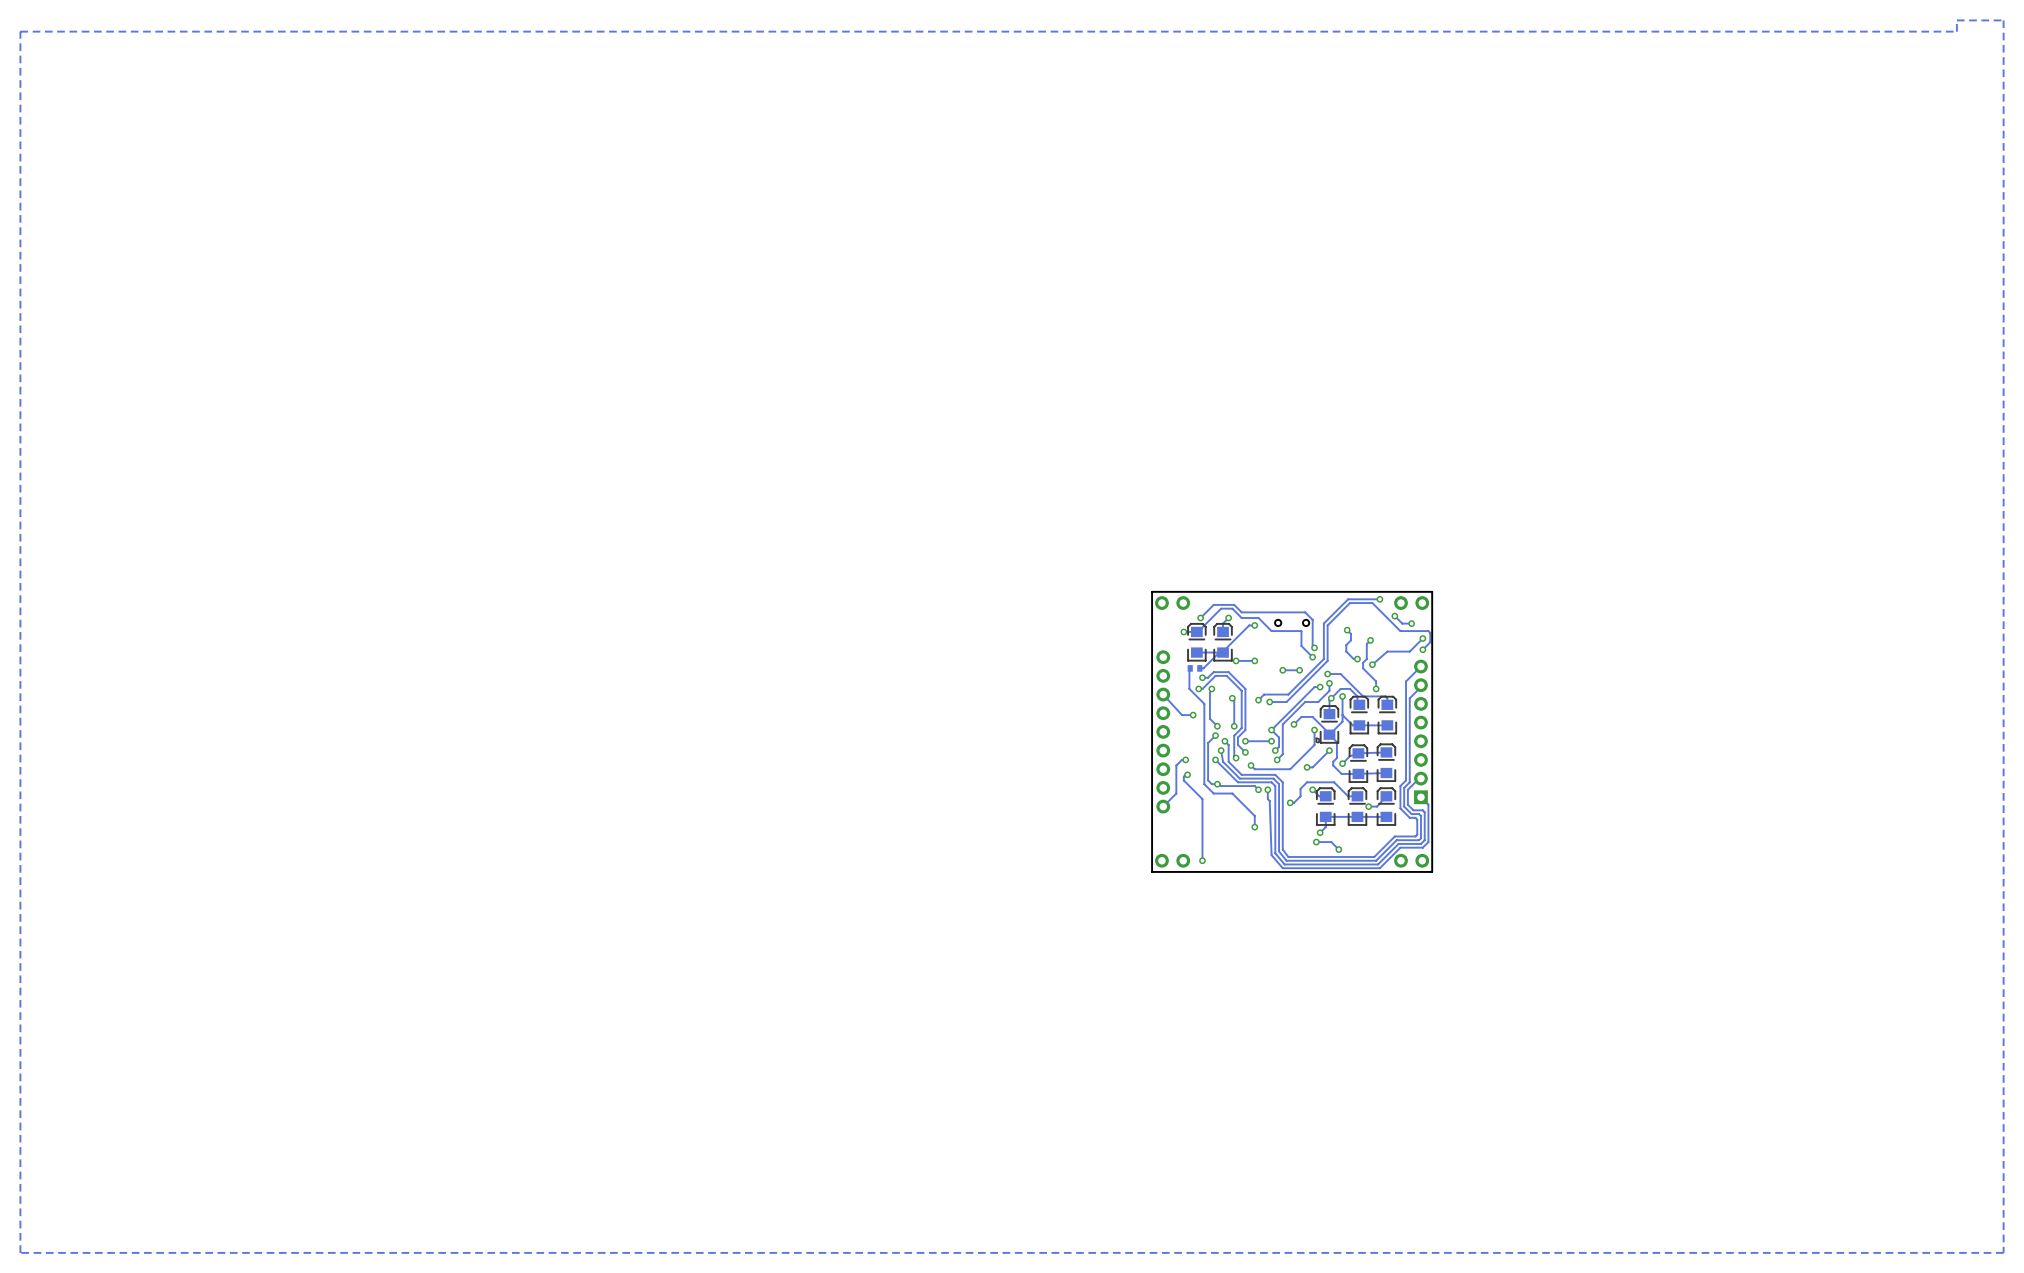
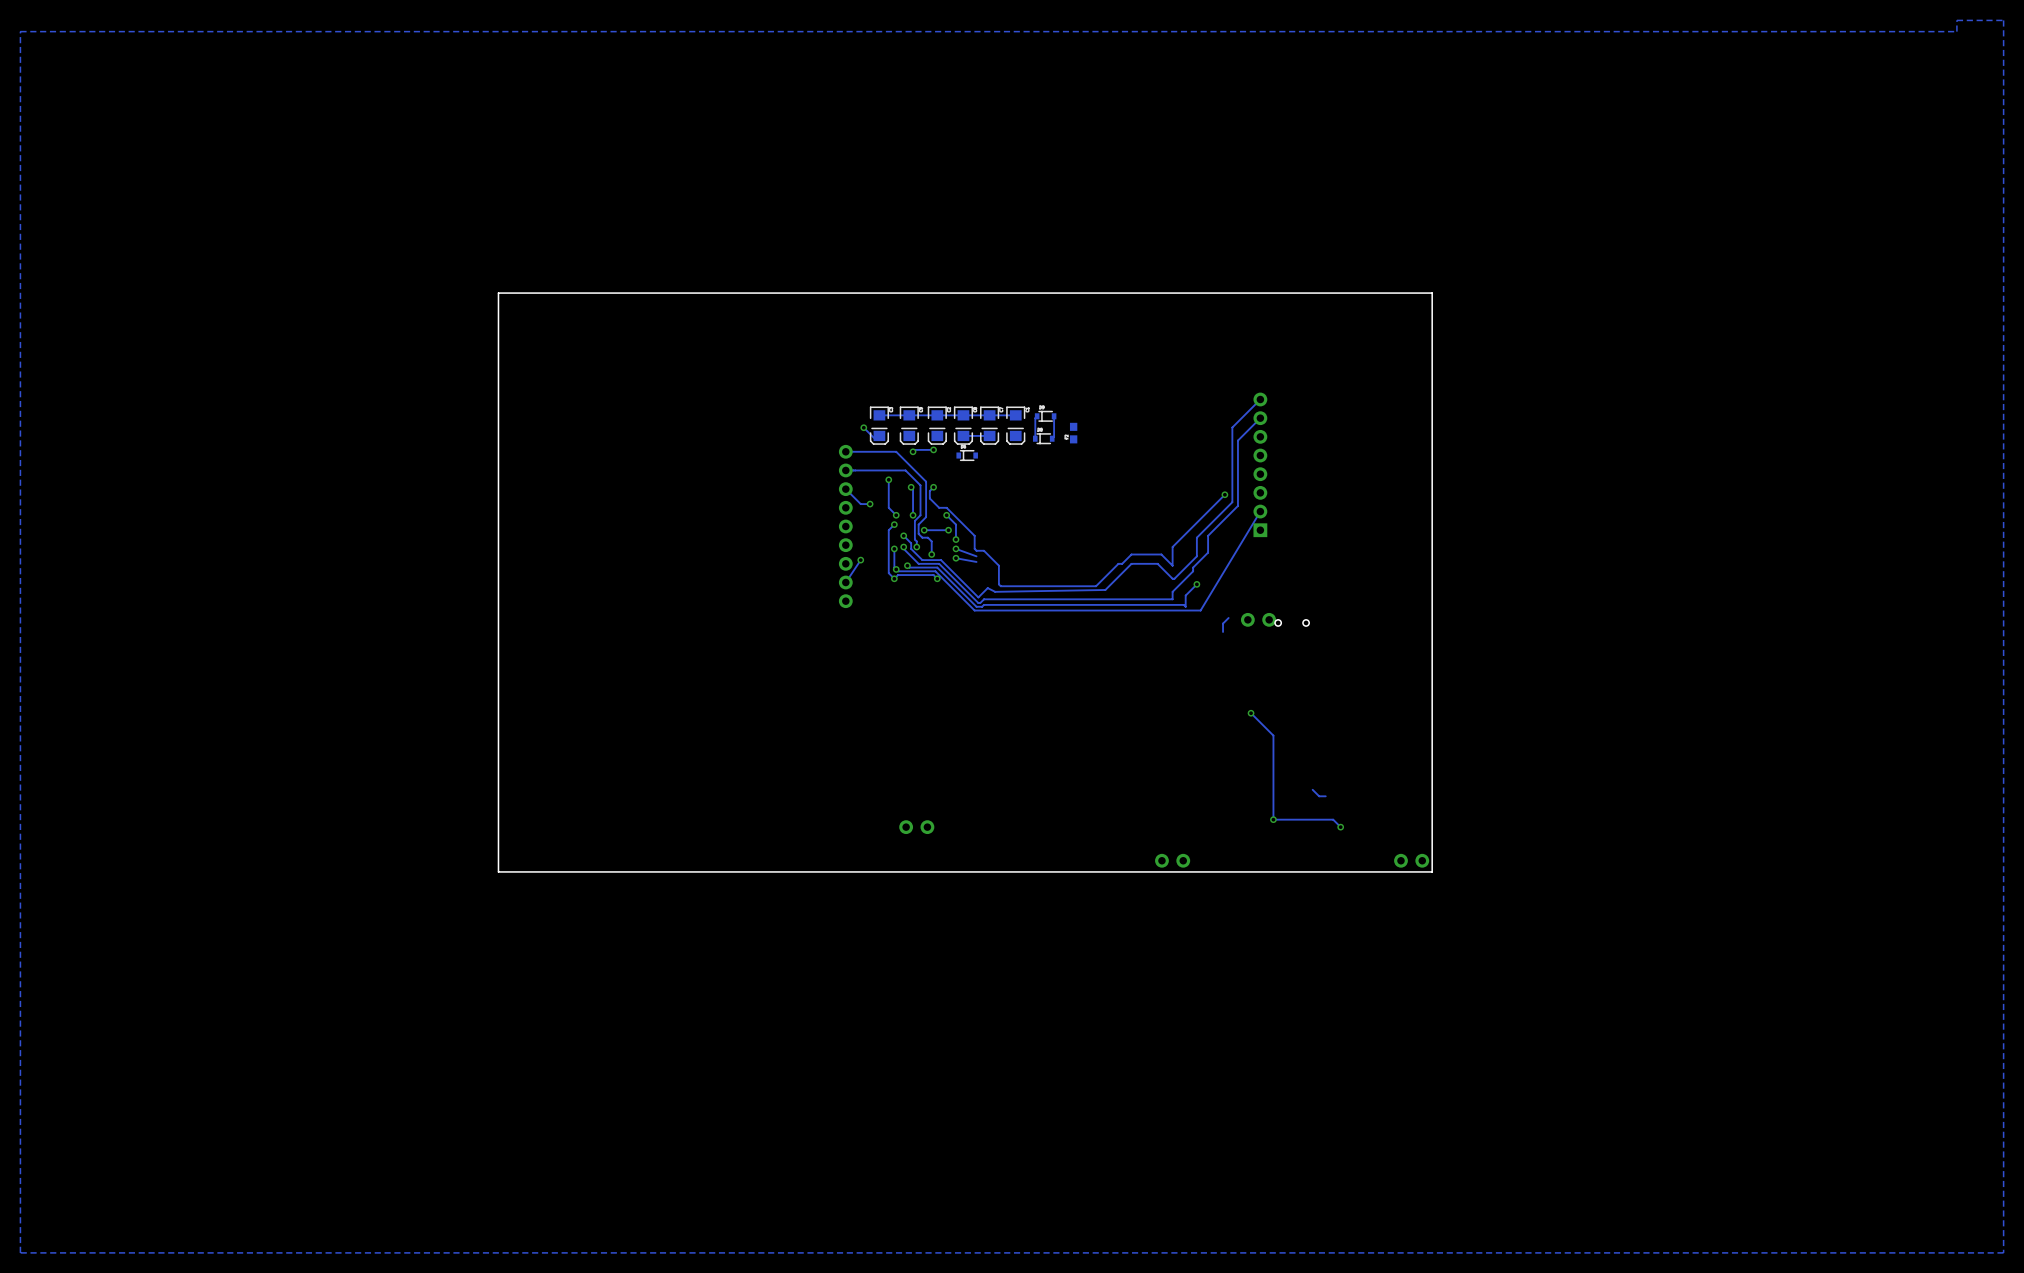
track: none -> (1260, 399) (1232, 427) (1232, 502) (1196, 537) (1196, 556) (1174, 578) (1157, 563) (1131, 563) (1105, 589) (995, 591) (987, 588) (978, 597) (941, 560) (922, 560) (911, 548) (911, 543) (903, 535)
track: none -> (1015, 415) (879, 415)
track: none -> (1037, 416) (1035, 418) (1035, 438)
part: none -> (1045, 416)
track: none -> (1054, 416) (1054, 436) (1052, 438)
track: none -> (1260, 418) (1237, 440) (1237, 505) (1208, 535) (1208, 552) (1172, 591) (1172, 599) (984, 599) (978, 603) (939, 563) (918, 563) (903, 547)
part: none -> (879, 425)
part: none -> (909, 425)
part: none -> (937, 425)
part: none -> (963, 425)
part: none -> (1015, 425)
track: none -> (863, 427) (875, 439) (879, 439) (879, 435)
via: none -> (863, 427)
part: none -> (1073, 433)
track: none -> (989, 435) (963, 435)
part: none -> (1043, 438)
track: none -> (933, 449) (914, 449) (913, 451)
via: none -> (933, 449)
track: none -> (845, 451) (896, 451) (926, 481) (926, 517) (918, 524) (918, 533) (931, 541) (931, 554)
via: none -> (913, 451)
part: none -> (967, 455)
part: none -> (1260, 464)
track: none -> (845, 470) (905, 470) (920, 485) (920, 515) (914, 520) (916, 547)
track: none -> (888, 479) (888, 507) (896, 515)
via: none -> (888, 479)
track: none -> (911, 487) (913, 489) (913, 515)
via: none -> (911, 487)
track: none -> (933, 487) (929, 491) (929, 498) (939, 507) (946, 507) (974, 535) (974, 548) (984, 550) (998, 565) (998, 584) (1000, 586) (1096, 586) (1118, 563) (1122, 563) (1131, 554) (1161, 554) (1172, 565) (1172, 547) (1224, 494)
via: none -> (933, 487)
track: none -> (845, 489) (860, 504) (870, 504)
via: none -> (1224, 494)
via: none -> (870, 504)
track: none -> (1260, 511) (1200, 610) (974, 610) (935, 571) (898, 571) (894, 567) (894, 548)
via: none -> (896, 515)
via: none -> (913, 515)
track: none -> (946, 515) (955, 524) (955, 539)
via: none -> (946, 515)
track: none -> (894, 524) (888, 530) (888, 573) (894, 578) (898, 575) (933, 575) (937, 578)
via: none -> (894, 524)
part: none -> (845, 526)
via: none -> (924, 530)
track: none -> (948, 530) (924, 530)
via: none -> (948, 530)
via: none -> (903, 535)
via: none -> (955, 539)
via: none -> (903, 547)
via: none -> (916, 547)
via: none -> (894, 548)
track: none -> (955, 548) (976, 556)
via: none -> (955, 548)
via: none -> (931, 554)
track: none -> (955, 558) (976, 561)
via: none -> (955, 558)
track: none -> (860, 560) (845, 582)
via: none -> (860, 560)
track: none -> (907, 565) (909, 567) (937, 567) (976, 606) (984, 604) (1183, 604) (1185, 606) (1185, 595) (1196, 584)
via: none -> (907, 565)
via: none -> (896, 569)
via: none -> (894, 578)
via: none -> (937, 578)
via: none -> (1196, 584)
board edge: (1432, 591) (1152, 591) (1152, 871) -> (1432, 591) (1432, 293) (498, 293) (498, 871) (1152, 871)
track: (1379, 599) (1348, 599) (1323, 623) (1323, 659) (1288, 694) (1264, 694) (1258, 700) -> none
via: (1379, 599) -> none
part: (1172, 603) -> none
part: (1411, 603) -> none
track: (1394, 616) (1402, 623) (1411, 623) -> none
via: (1394, 616) -> none
track: (1200, 617) (1213, 604) (1234, 604) (1241, 612) (1305, 612) (1312, 619) (1312, 646) (1314, 647) -> none
via: (1200, 617) -> none
via: (1228, 617) -> none
part: none -> (1258, 619)
via: (1411, 623) -> none
track: (1254, 625) (1249, 625) (1223, 652) (1196, 652) (1193, 648) -> none
via: (1254, 625) -> none
track: (1347, 630) (1350, 633) (1350, 640) (1346, 645) (1346, 651) (1353, 659) (1357, 659) -> none
via: (1347, 630) -> none
track: (1183, 631) (1197, 631) (1221, 608) (1232, 608) (1241, 617) (1258, 617) (1271, 631) (1301, 631) (1301, 646) (1312, 657) -> none
via: (1183, 631) -> none
track: (1422, 638) (1409, 651) (1387, 651) (1372, 664) (1374, 664) -> none
via: (1422, 638) -> none
track: (1370, 640) (1366, 644) (1366, 659) (1363, 662) (1363, 668) (1376, 681) (1376, 688) -> none
via: (1370, 640) -> none
part: (1196, 642) -> none
part: (1223, 642) -> none
via: (1314, 647) -> none
track: (1422, 649) (1430, 642) (1430, 632) (1428, 631) (1400, 631) (1372, 603) (1350, 603) (1327, 625) (1327, 660) (1286, 702) (1269, 702) -> none
via: (1422, 649) -> none
track: (1219, 652) (1203, 668) (1199, 668) -> none
via: (1312, 657) -> none
via: (1357, 659) -> none
via: (1236, 660) -> none
track: (1254, 660) (1236, 660) -> none
via: (1254, 660) -> none
via: (1372, 664) -> none
track: (1420, 666) (1406, 681) (1406, 780) (1400, 786) (1400, 808) (1409, 817) (1417, 819) (1417, 834) (1415, 836) (1394, 836) (1374, 857) (1288, 857) (1282, 849) (1282, 782) (1275, 774) (1241, 774) (1228, 761) (1228, 744) (1224, 741) -> none
track: (1190, 668) (1189, 688) (1204, 703) (1204, 784) (1213, 793) (1232, 793) (1254, 815) (1254, 827) -> none
part: (1195, 668) -> none
via: (1282, 670) -> none
track: (1299, 670) (1282, 670) -> none
via: (1299, 670) -> none
track: (1327, 674) (1340, 674) (1363, 696) (1385, 696) (1387, 704) -> none
via: (1327, 674) -> none
track: (1202, 677) (1208, 677) (1213, 672) (1228, 672) (1245, 688) (1245, 730) (1237, 737) (1237, 744) (1245, 752) -> none
via: (1202, 677) -> none
track: (1329, 683) (1329, 690) (1318, 702) (1305, 702) (1282, 724) (1282, 754) (1277, 759) -> none
via: (1329, 683) -> none
track: (1420, 685) (1409, 698) (1409, 782) (1404, 787) (1404, 806) (1411, 814) (1420, 815) (1420, 838) (1419, 840) (1396, 840) (1376, 860) (1286, 860) (1279, 851) (1279, 784) (1273, 778) (1239, 778) (1223, 761) (1221, 750) -> none
track: (1320, 687) (1314, 687) (1271, 730) (1279, 737) (1279, 746) (1275, 750) -> none
via: (1320, 687) -> none
track: (1198, 688) (1202, 688) (1215, 675) (1226, 675) (1241, 690) (1241, 728) (1234, 735) (1234, 756) (1236, 758) -> none
via: (1198, 688) -> none
track: (1211, 688) (1209, 692) (1209, 718) (1217, 726) -> none
via: (1211, 688) -> none
via: (1376, 688) -> none
track: (1163, 694) (1181, 715) (1193, 715) -> none
track: (1342, 696) (1342, 721) (1329, 734) (1336, 742) (1336, 758) (1333, 761) (1333, 765) (1341, 773) (1386, 773) -> none
via: (1342, 696) -> none
track: (1232, 698) (1234, 700) (1234, 726) -> none
via: (1232, 698) -> none
via: (1331, 698) -> none
via: (1258, 700) -> none
via: (1269, 702) -> none
track: (1359, 704) (1357, 696) (1350, 688) (1340, 688) (1329, 700) (1329, 714) -> none
track: none -> (1251, 713) (1273, 735) (1273, 819) (1333, 819) (1340, 827)
via: none -> (1251, 713)
via: (1193, 715) -> none
track: (1342, 715) (1352, 725) (1387, 725) -> none
part: (1359, 715) -> none
part: (1387, 715) -> none
track: (1293, 724) (1301, 716) (1312, 716) (1329, 733) (1329, 737) -> none
via: (1293, 724) -> none
part rotation: 0° (1329, 724) -> 180° (989, 425)
part position: (1329, 724) -> (989, 425)
via: (1217, 726) -> none
via: (1234, 726) -> none
via: (1271, 730) -> none
track: (1314, 730) (1314, 744) (1290, 769) (1254, 769) (1251, 765) -> none
via: (1314, 730) -> none
part: (1163, 731) -> none
part: (1420, 731) -> none
track: (1215, 735) (1208, 743) (1208, 780) (1211, 784) (1221, 786) (1254, 786) (1258, 789) -> none
via: (1215, 735) -> none
via: (1224, 741) -> none
via: (1245, 741) -> none
track: (1271, 741) (1245, 741) -> none
via: (1271, 741) -> none
via: (1221, 750) -> none
via: (1275, 750) -> none
track: (1329, 750) (1312, 767) (1307, 767) -> none
via: (1329, 750) -> none
via: (1245, 752) -> none
track: (1386, 752) (1358, 753) (1350, 756) (1342, 763) -> none
via: (1236, 758) -> none
track: (1185, 759) (1181, 759) (1176, 765) (1176, 793) (1163, 806) -> none
via: (1185, 759) -> none
track: (1215, 759) (1237, 782) (1271, 782) (1275, 786) (1275, 853) (1284, 864) (1378, 864) (1398, 843) (1420, 843) (1424, 840) (1424, 812) (1422, 810) (1413, 810) (1407, 804) (1407, 789) (1420, 778) -> none
via: (1215, 759) -> none
via: (1277, 759) -> none
part: (1386, 762) -> none
via: (1342, 763) -> none
part: (1358, 763) -> none
via: (1251, 765) -> none
via: (1307, 767) -> none
track: (1187, 774) (1183, 776) (1183, 780) (1202, 799) (1202, 860) -> none
via: (1187, 774) -> none
via: (1217, 784) -> none
via: (1258, 789) -> none
track: (1267, 789) (1271, 855) (1282, 868) (1379, 868) (1400, 847) (1422, 847) (1428, 842) (1428, 804) (1420, 797) -> none
via: (1267, 789) -> none
via: (1312, 789) -> none
track: (1357, 796) (1348, 796) (1334, 782) (1307, 782) (1300, 788) (1300, 796) (1293, 802) (1290, 802) -> none
track: (1386, 796) (1377, 806) (1368, 806) -> none
via: (1290, 802) -> none
part: (1325, 806) -> none
part: (1357, 806) -> none
via: (1368, 806) -> none
part: (1386, 806) -> none
track: (1386, 816) (1325, 816) (1325, 827) (1320, 832) -> none
via: none -> (1273, 819)
part: none -> (916, 827)
via: (1254, 827) -> none
via: none -> (1340, 827)
via: (1320, 832) -> none
track: (1316, 842) (1331, 842) (1338, 849) -> none
via: (1316, 842) -> none
via: (1338, 849) -> none
via: (1202, 860) -> none

